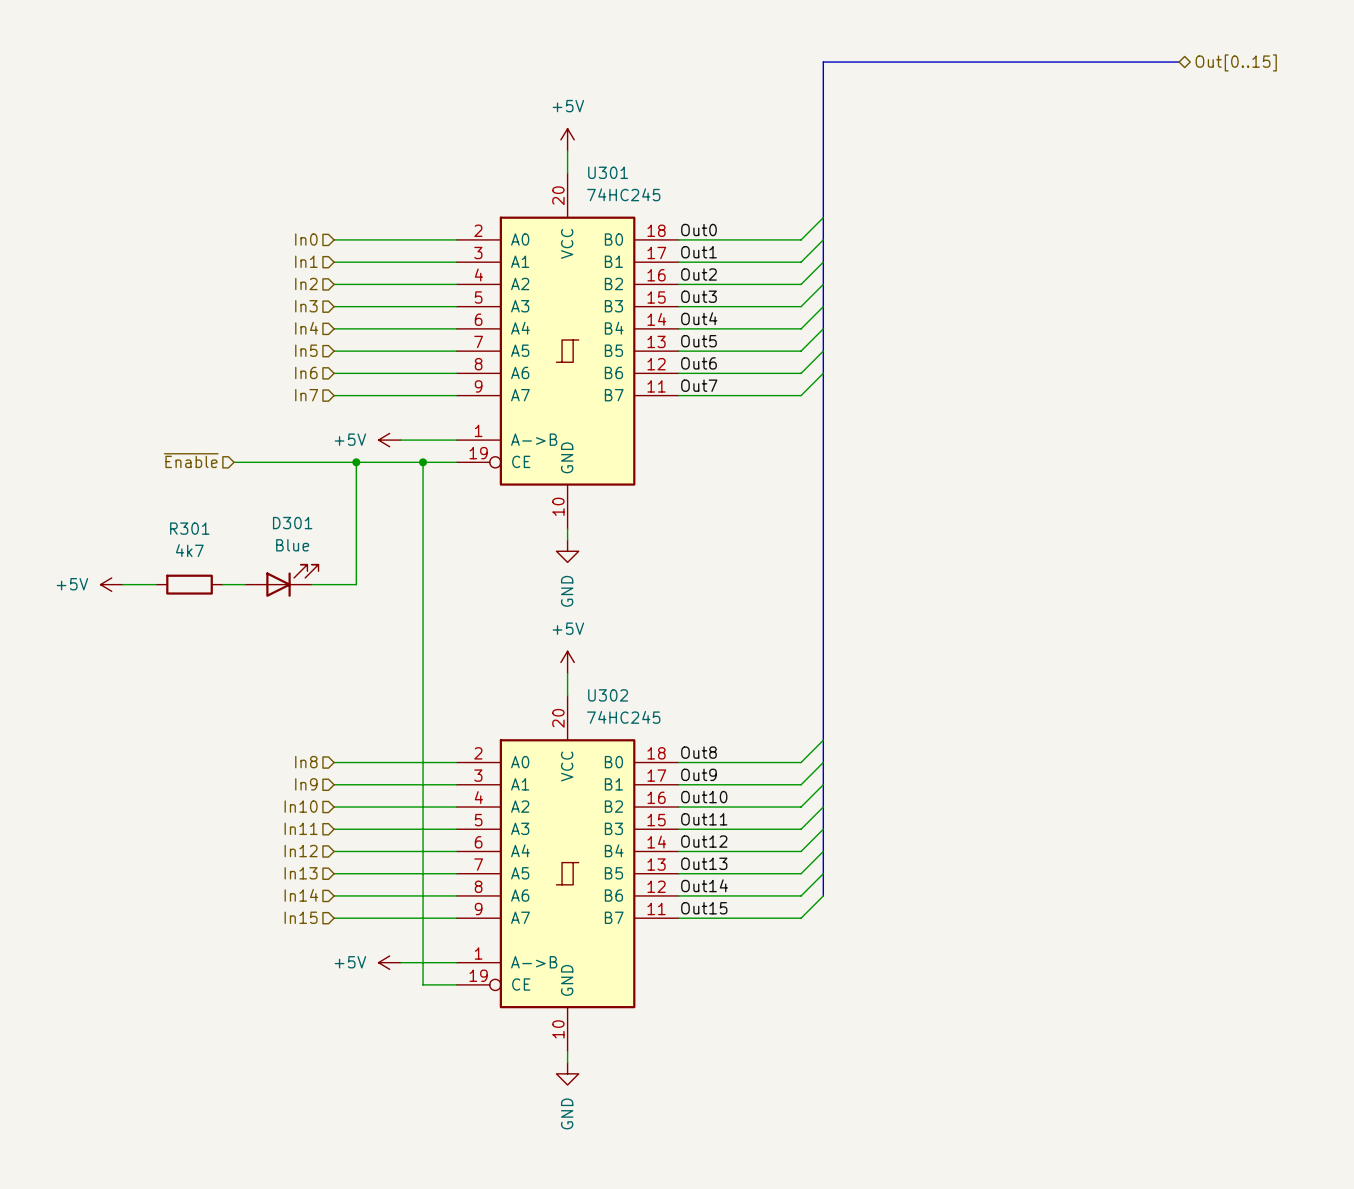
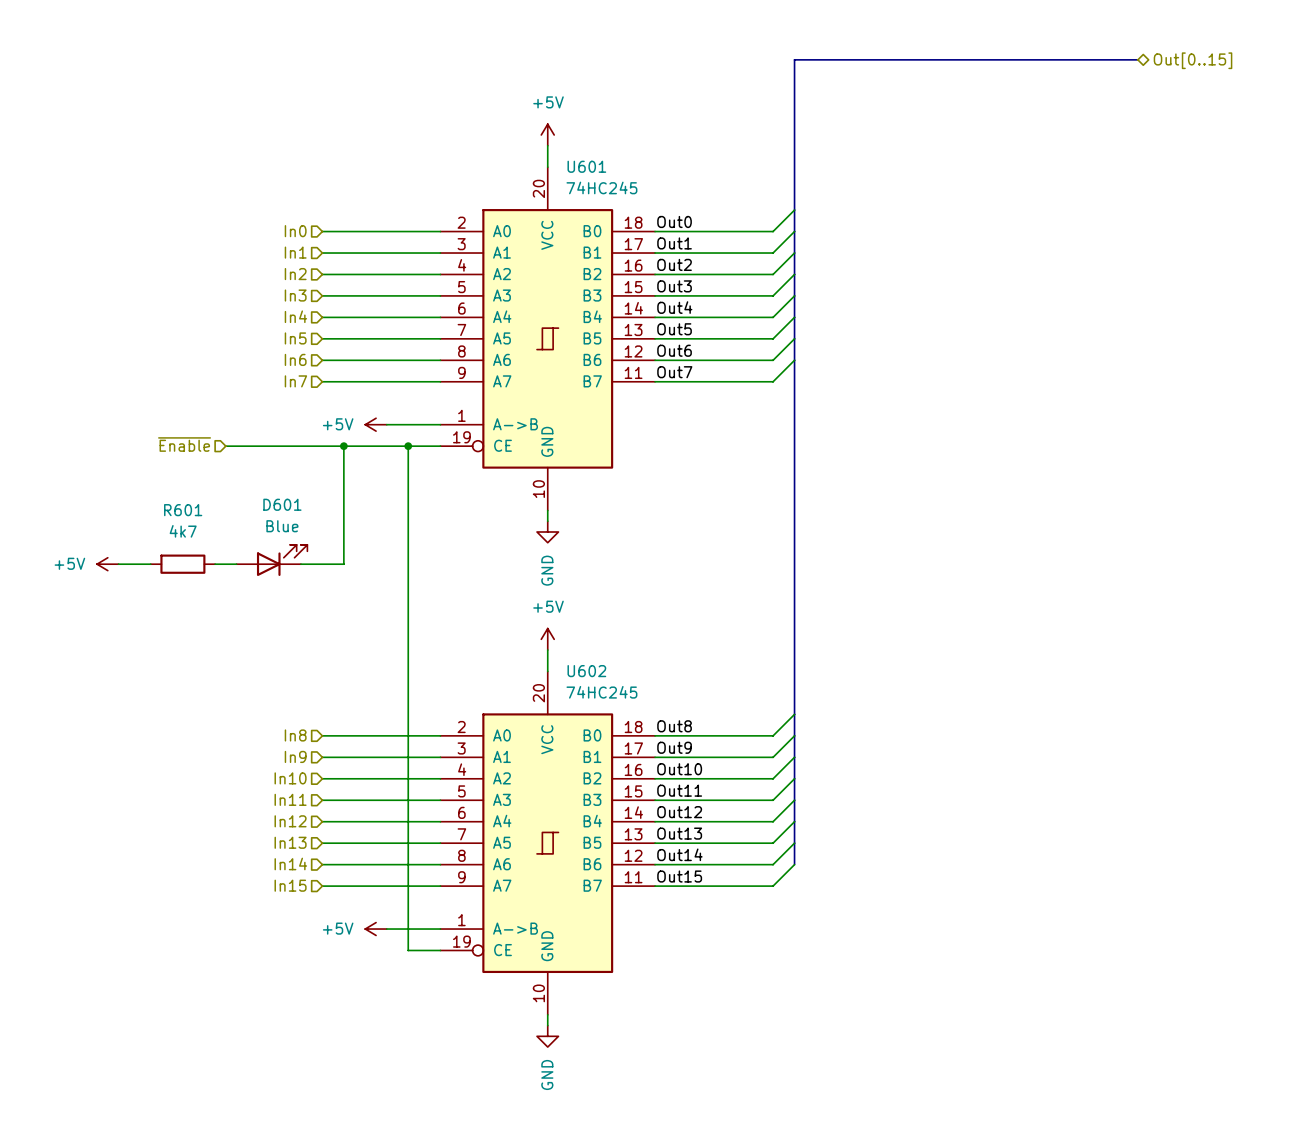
U301 name: U301 (608, 172) -> U601 (586, 166)
D301 name: D301 (292, 523) -> D601 (282, 504)
R301 name: R301 (189, 528) -> R601 (183, 510)
U302 name: U302 (608, 695) -> U602 (586, 671)

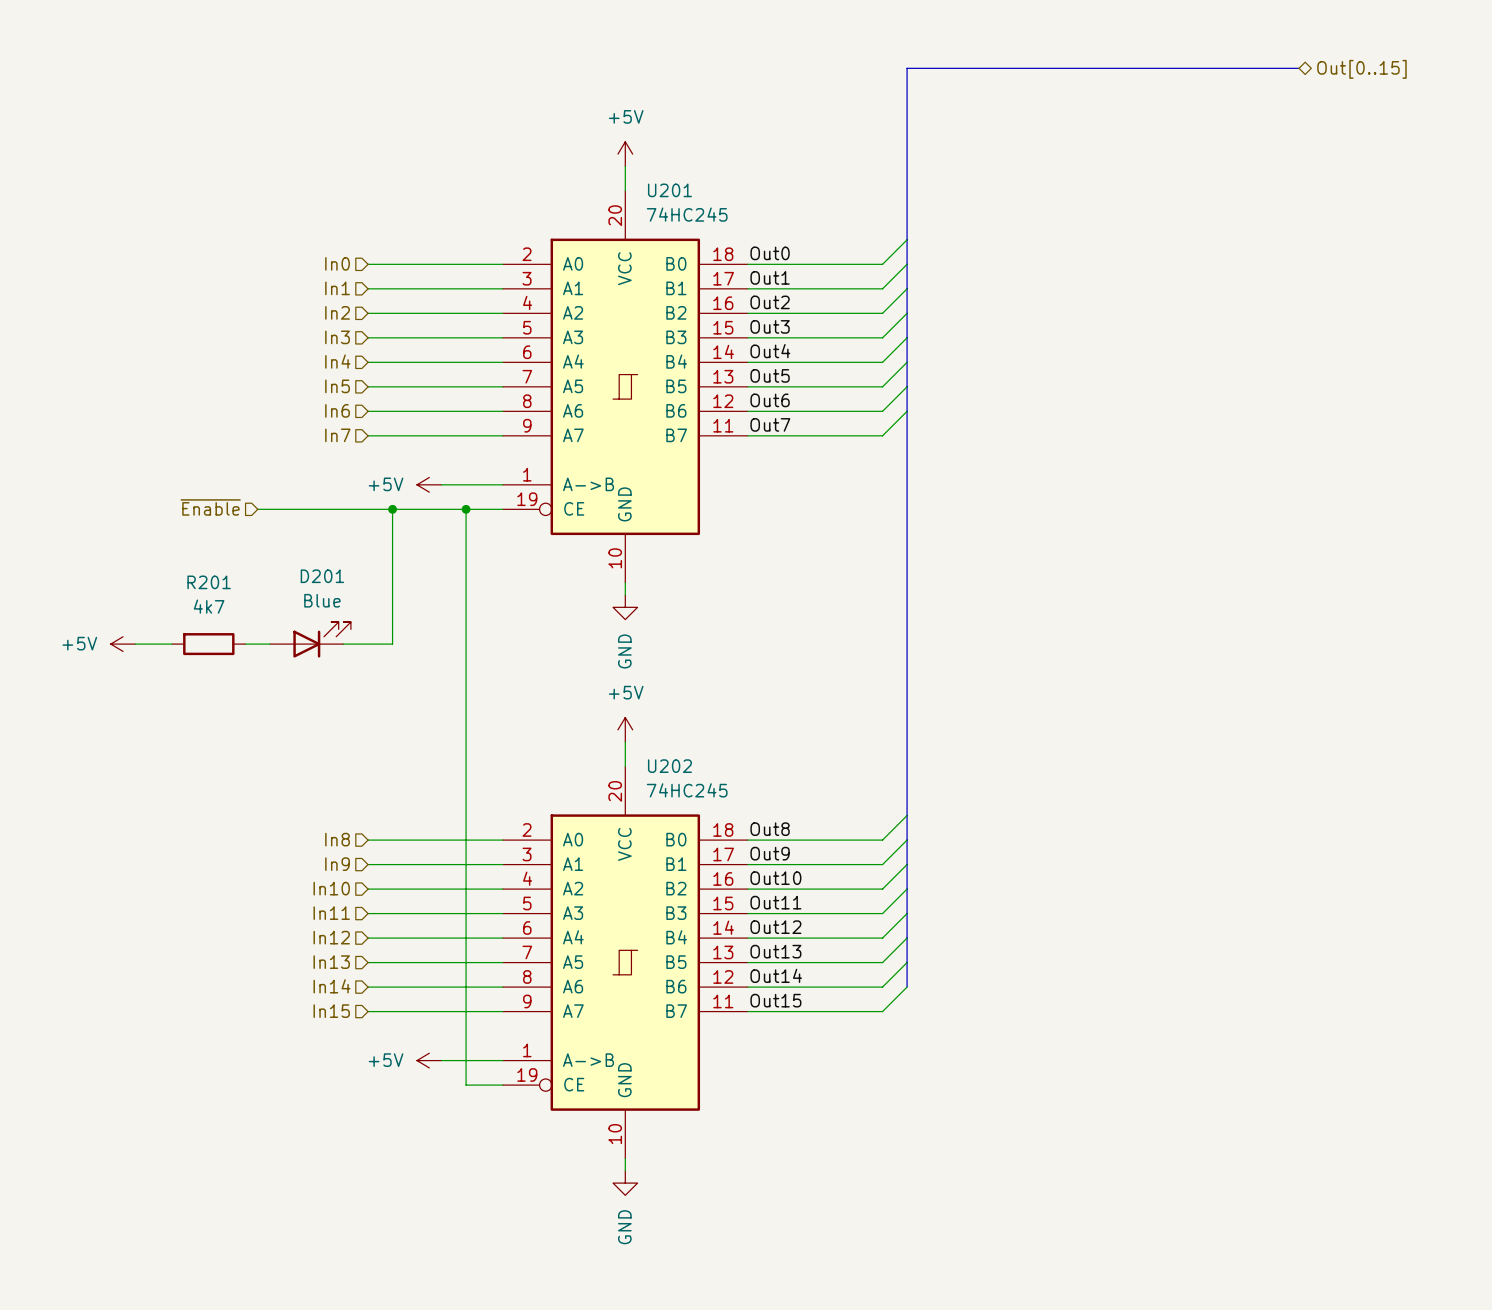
U601 name: U601 (586, 166) -> U201 (669, 190)
D601 name: D601 (282, 504) -> D201 (322, 576)
R601 name: R601 (183, 510) -> R201 (209, 582)
U602 name: U602 (586, 671) -> U202 (669, 766)

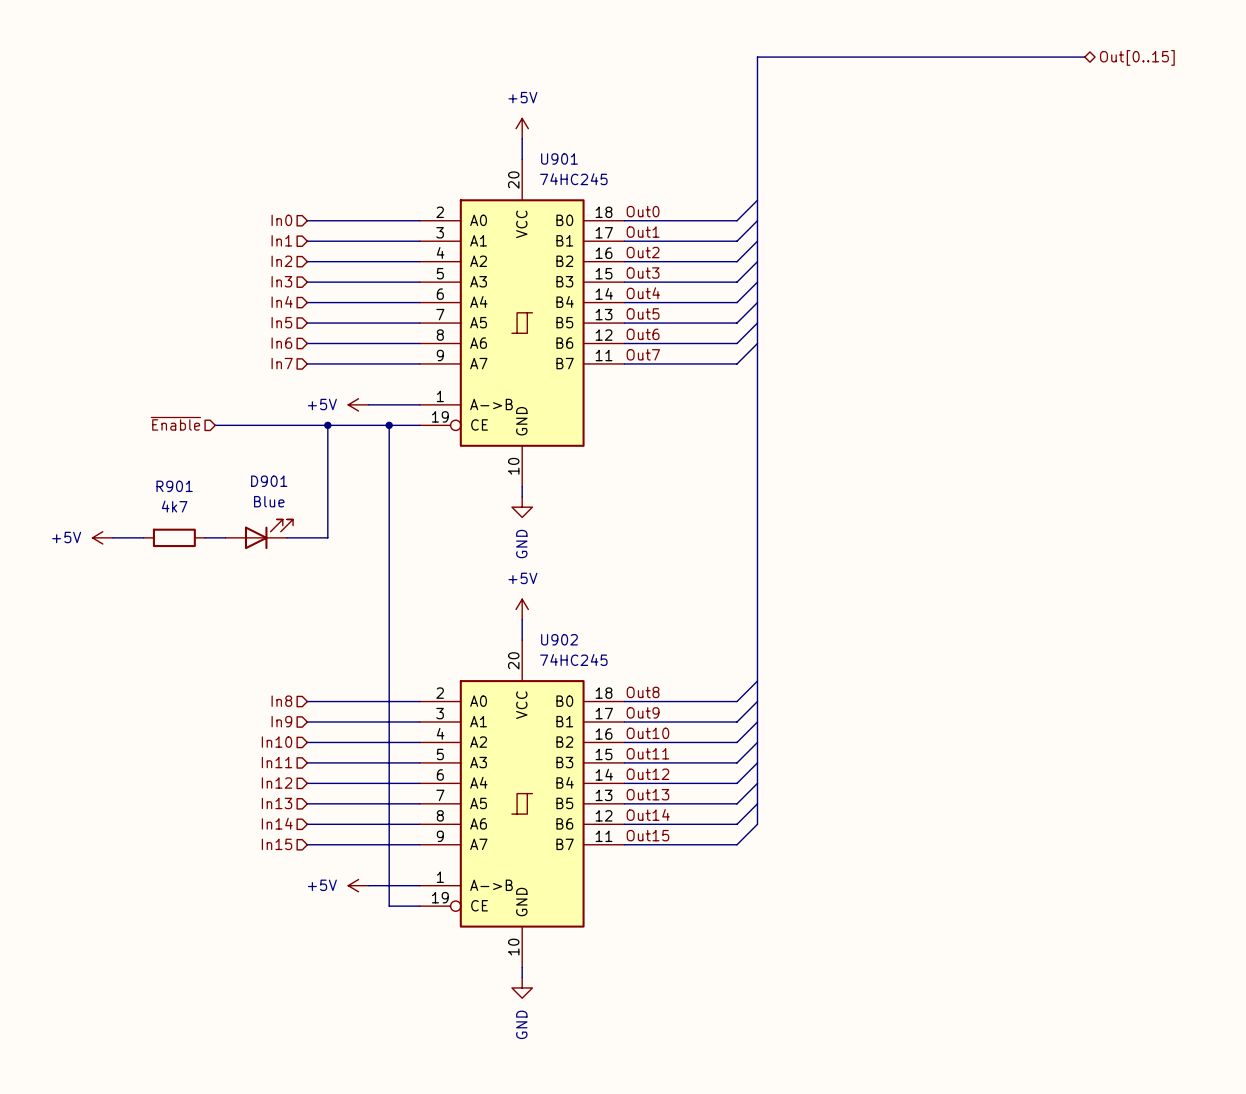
U201 name: U201 (669, 190) -> U901 (559, 158)
D201 name: D201 (322, 576) -> D901 (269, 481)
R201 name: R201 (209, 582) -> R901 (174, 486)
U202 name: U202 (669, 766) -> U902 (559, 639)

